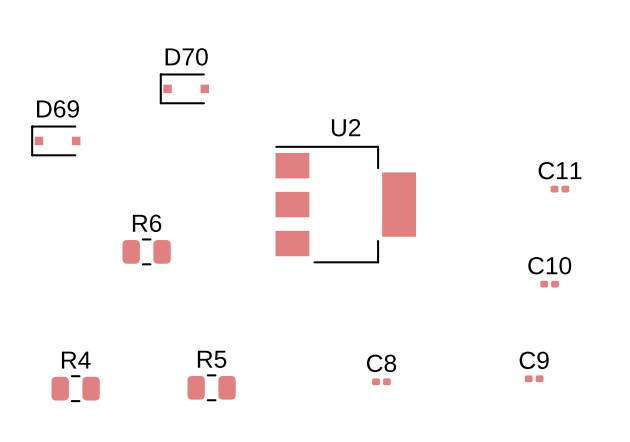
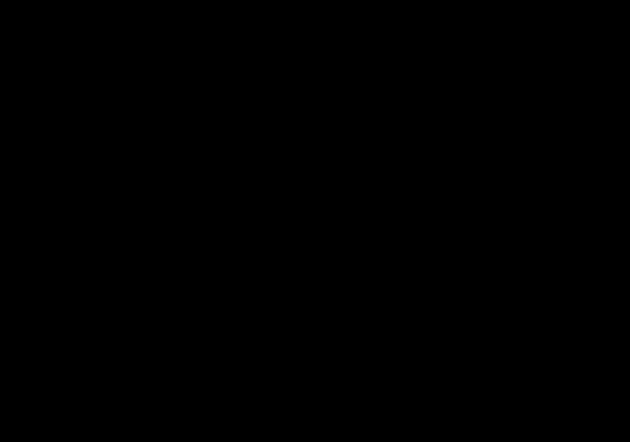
D70: (184, 88) -> none
D69: (55, 140) -> none
C11: (559, 189) -> none
U2: (345, 204) -> none
R6: (146, 251) -> none
C10: (549, 284) -> none
C9: (534, 378) -> none
C8: (381, 381) -> none
R5: (211, 387) -> none
R4: (75, 388) -> none

